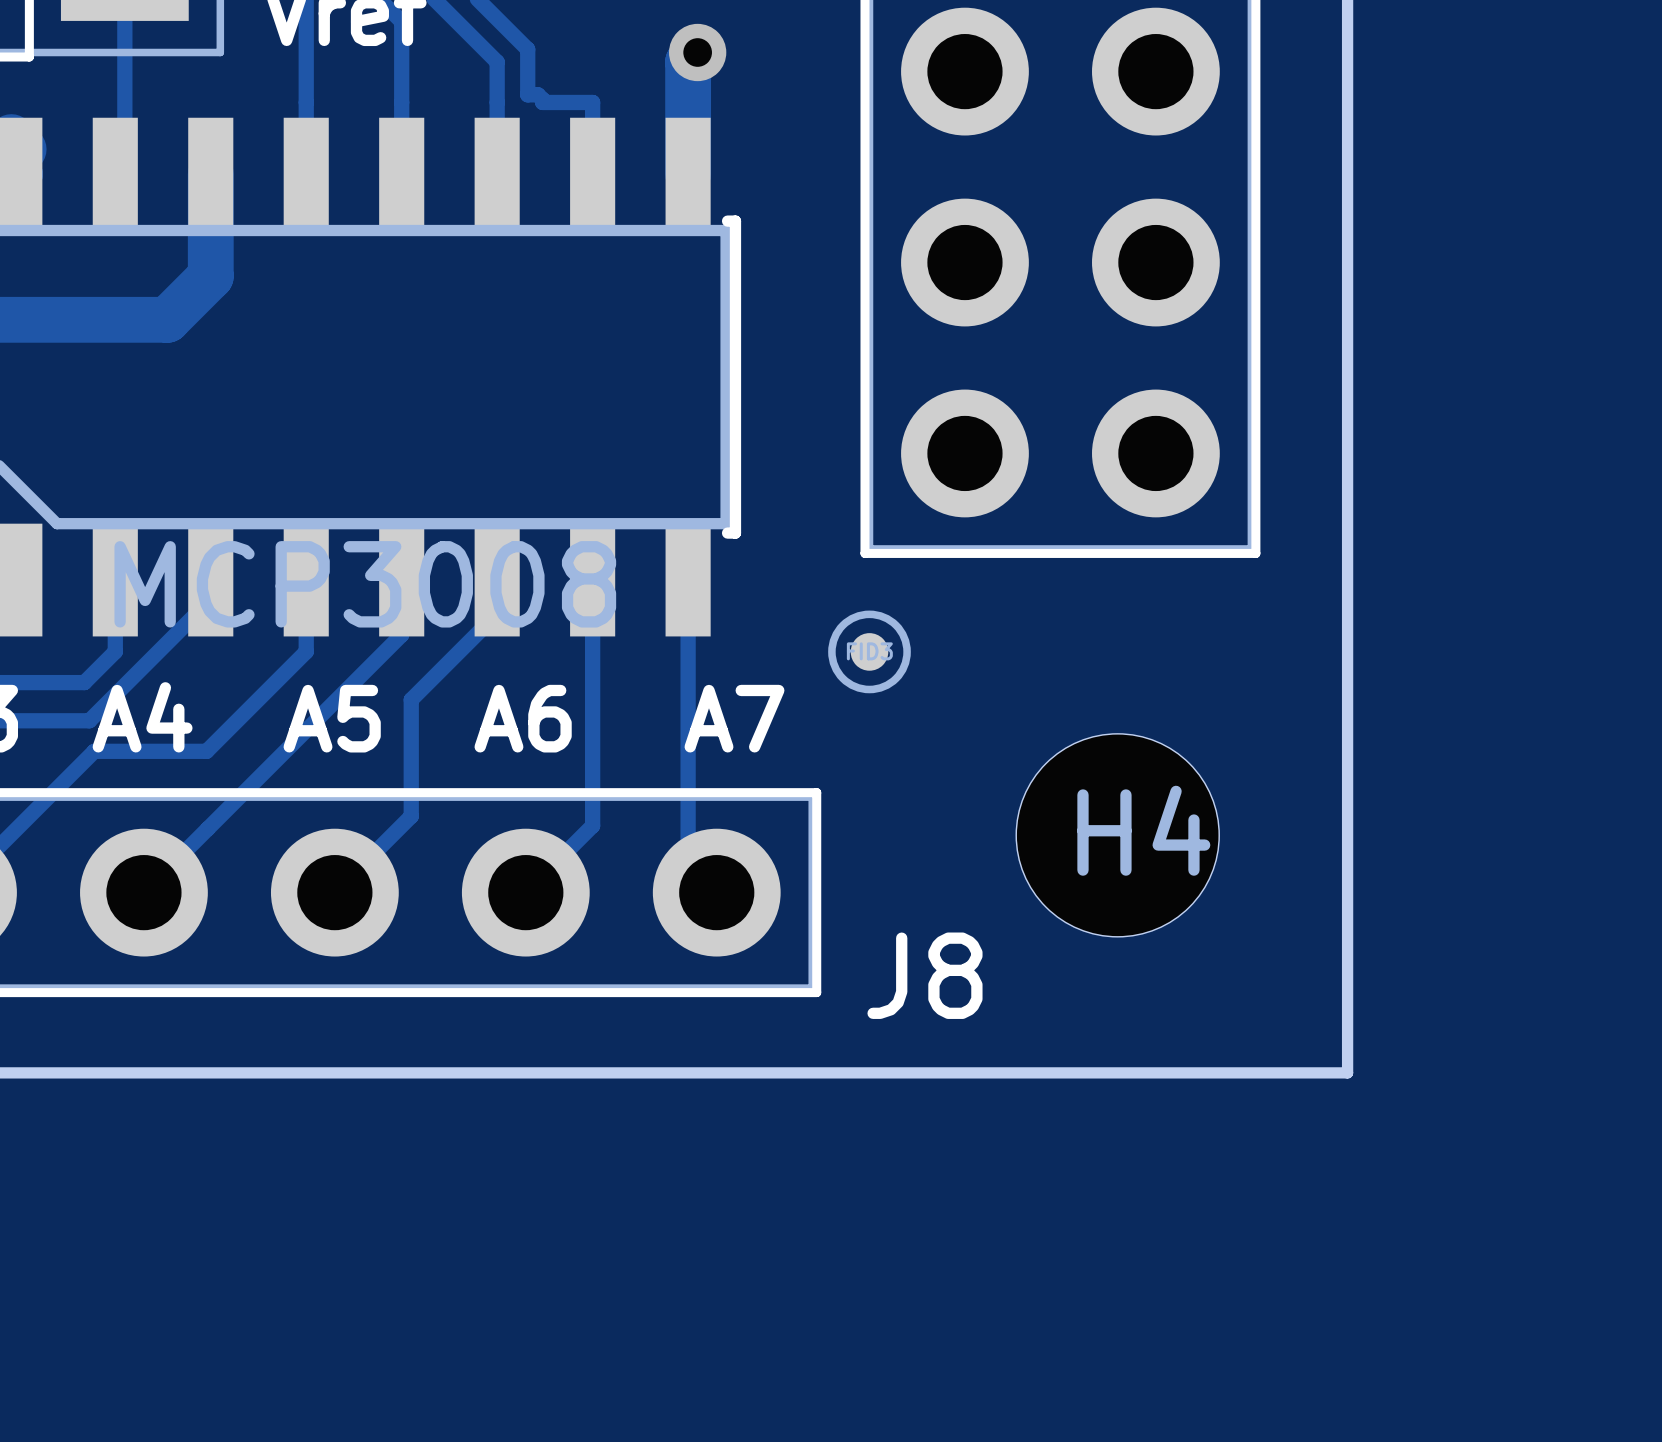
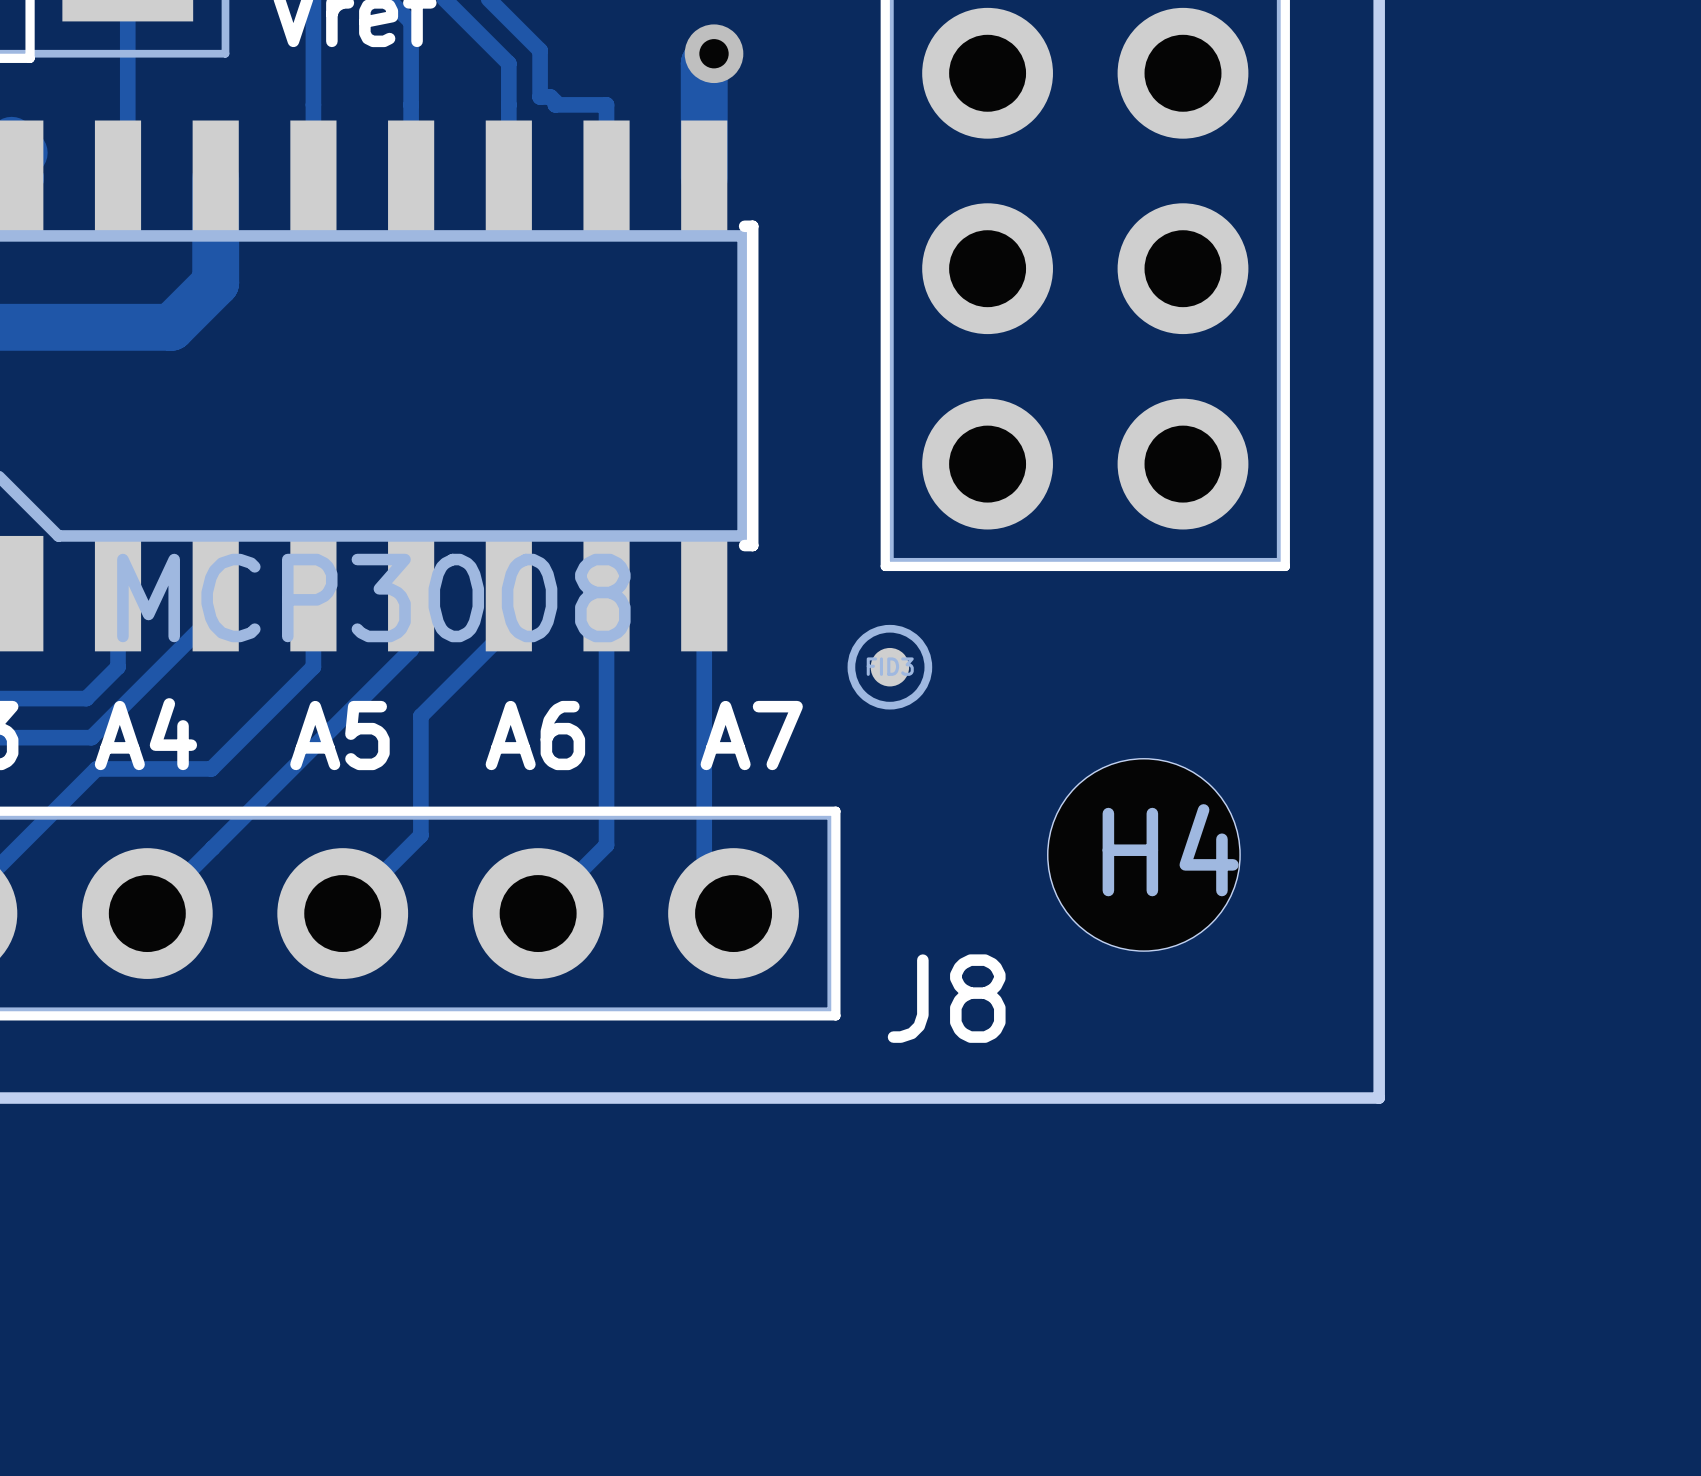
H4 footprint: [1016, 733, 1220, 937] -> [1047, 758, 1241, 952]

